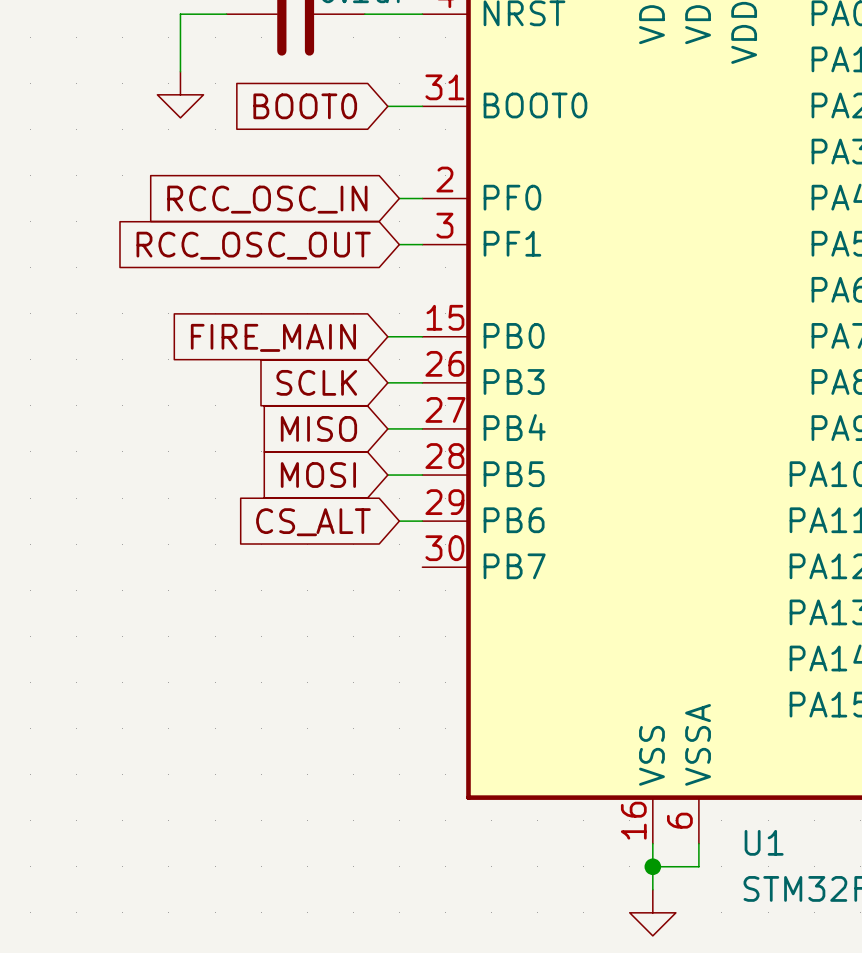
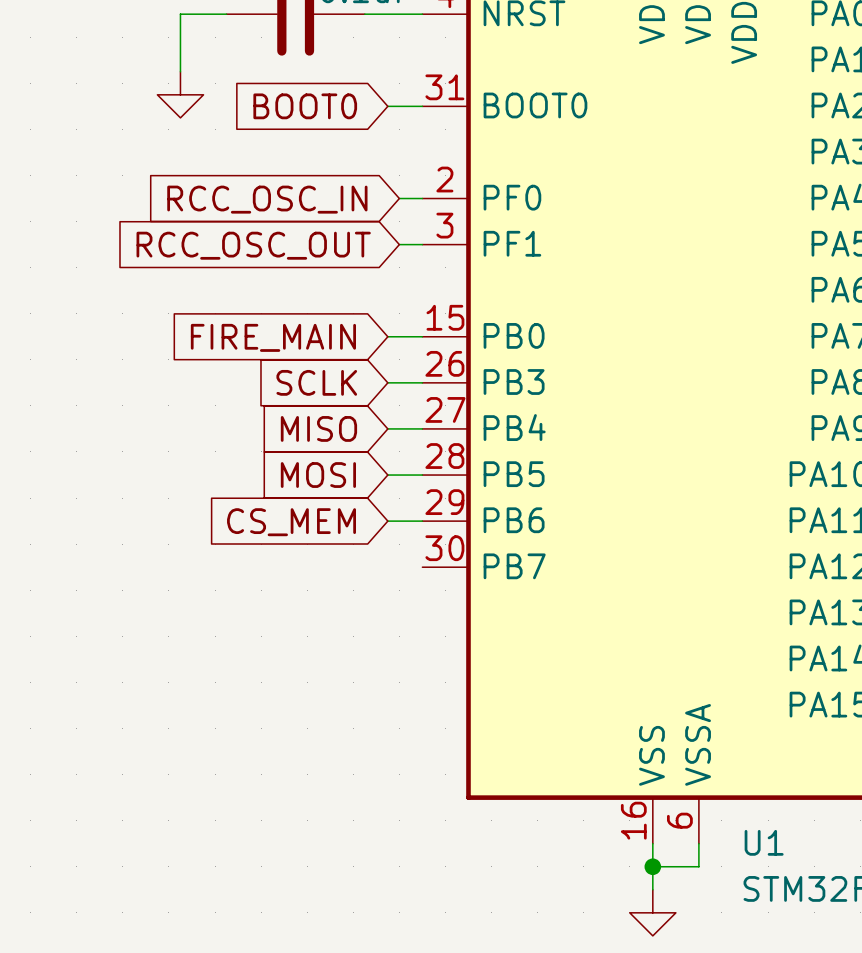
wire: none -> (387, 521) (399, 521)
global label: CS_ALT (313, 522) -> CS_MEM (291, 522)

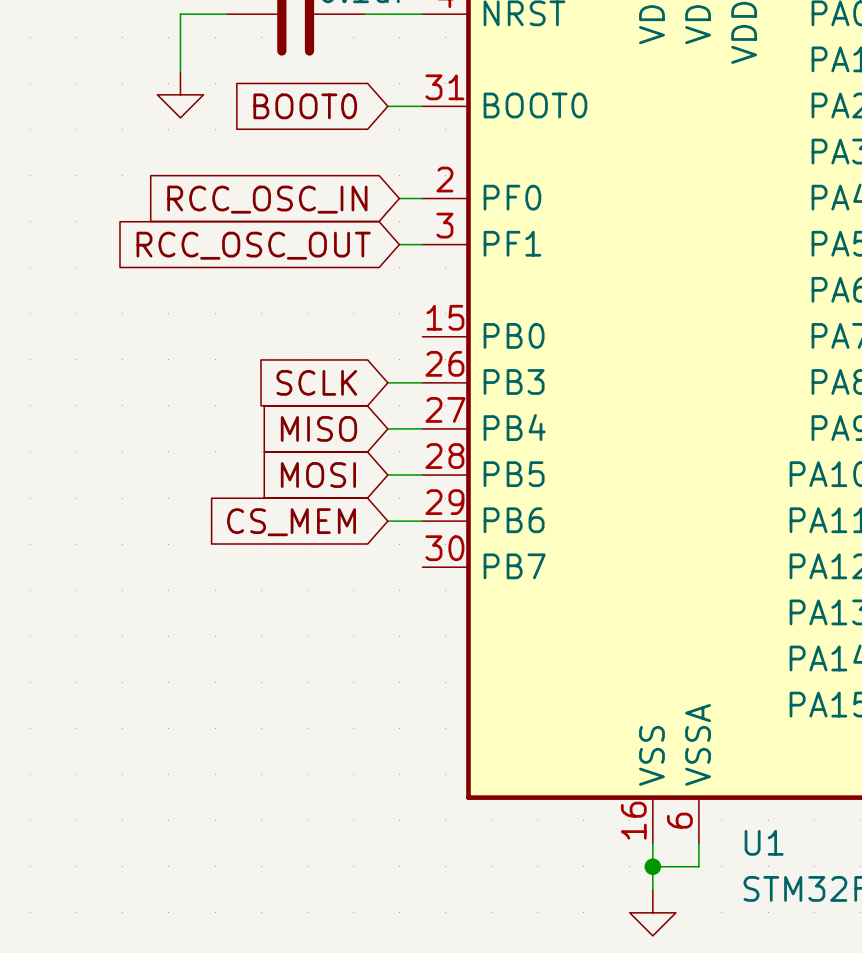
wire: (387, 336) (422, 336) -> none
global label: FIRE_MAIN (273, 337) -> none

